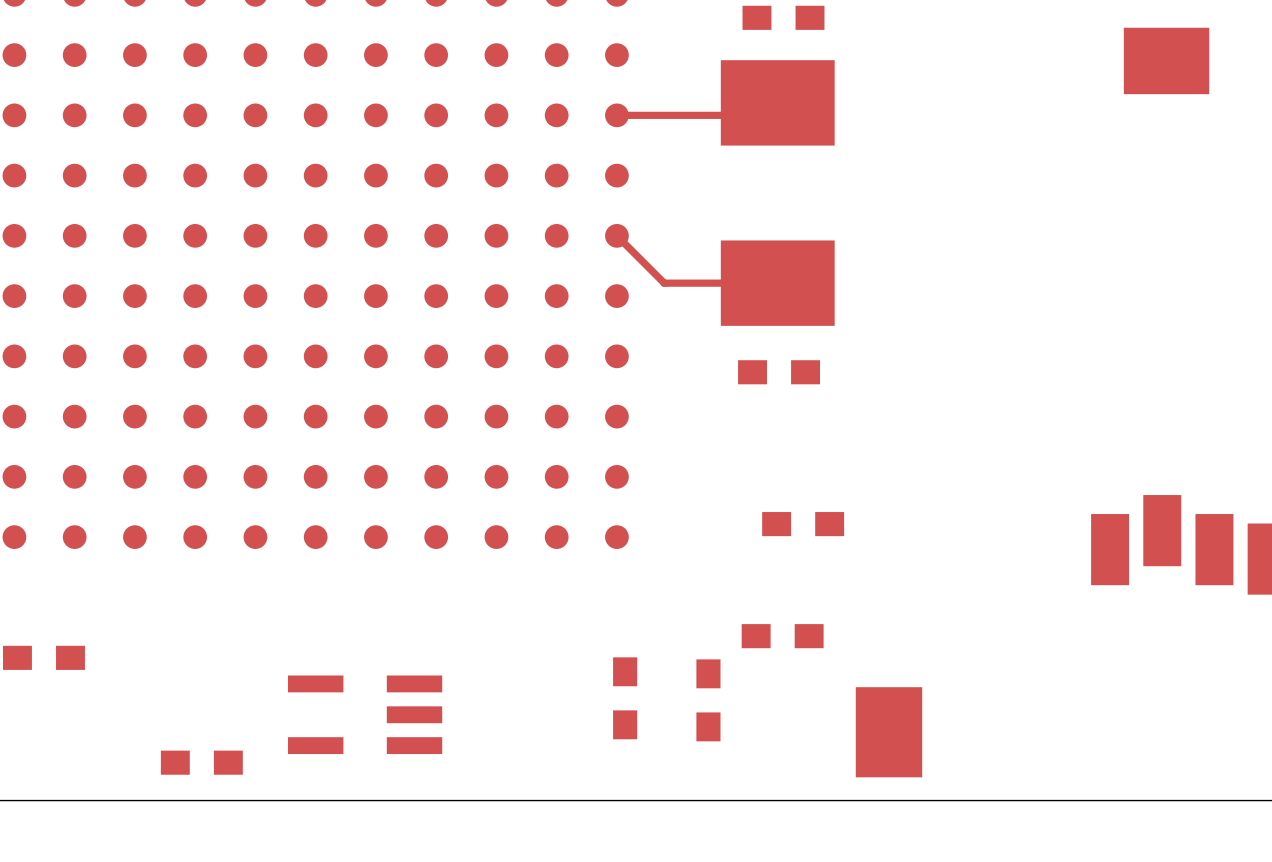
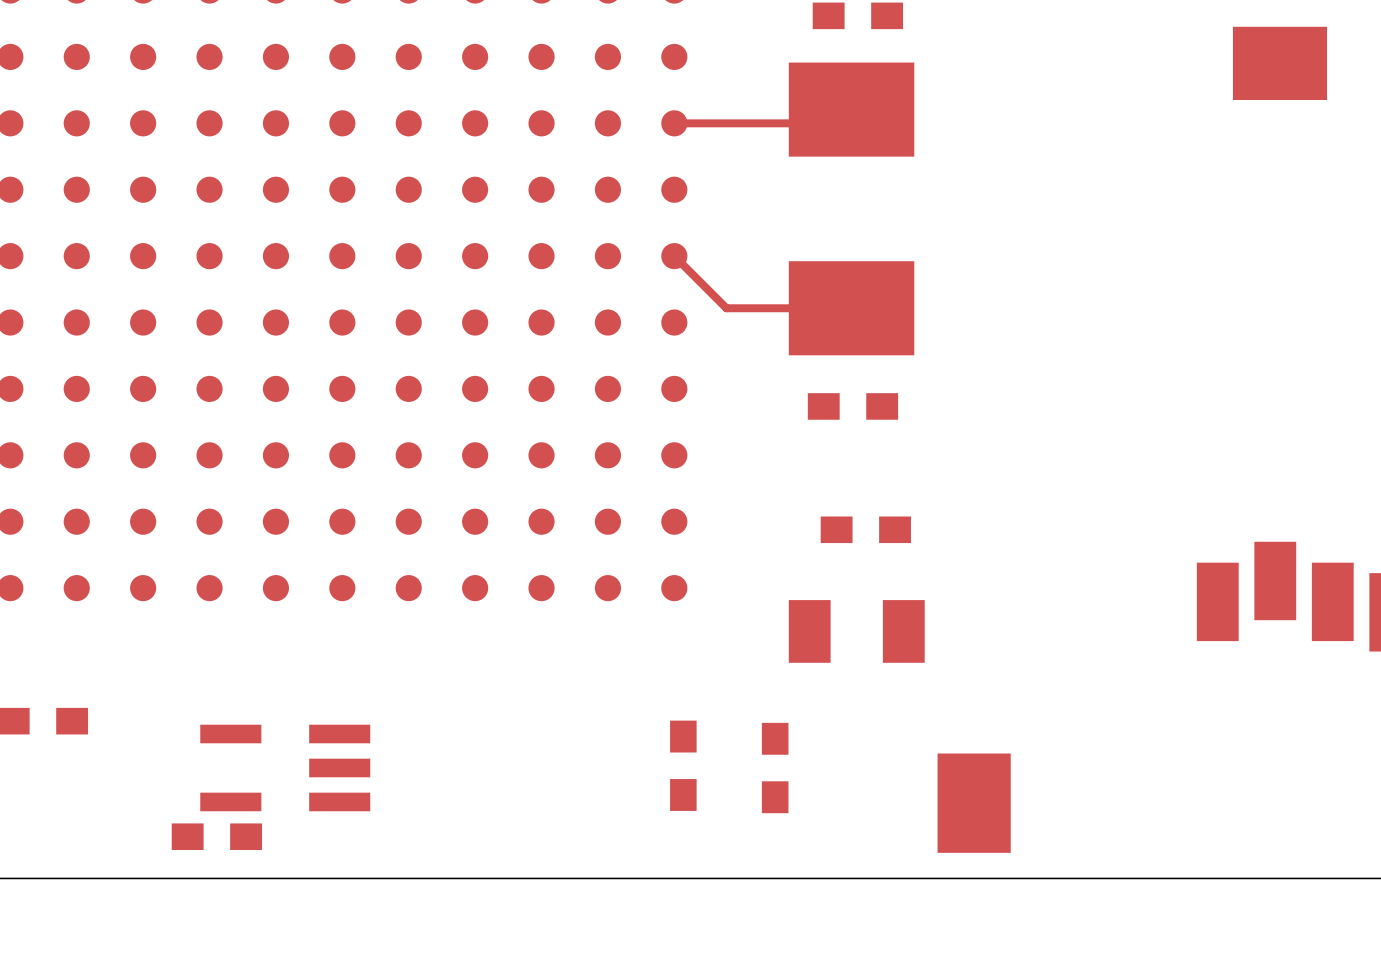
part position: (803, 524) -> (865, 529)
part: none -> (856, 631)
part: (782, 636) -> none
part position: (365, 714) -> (285, 767)

